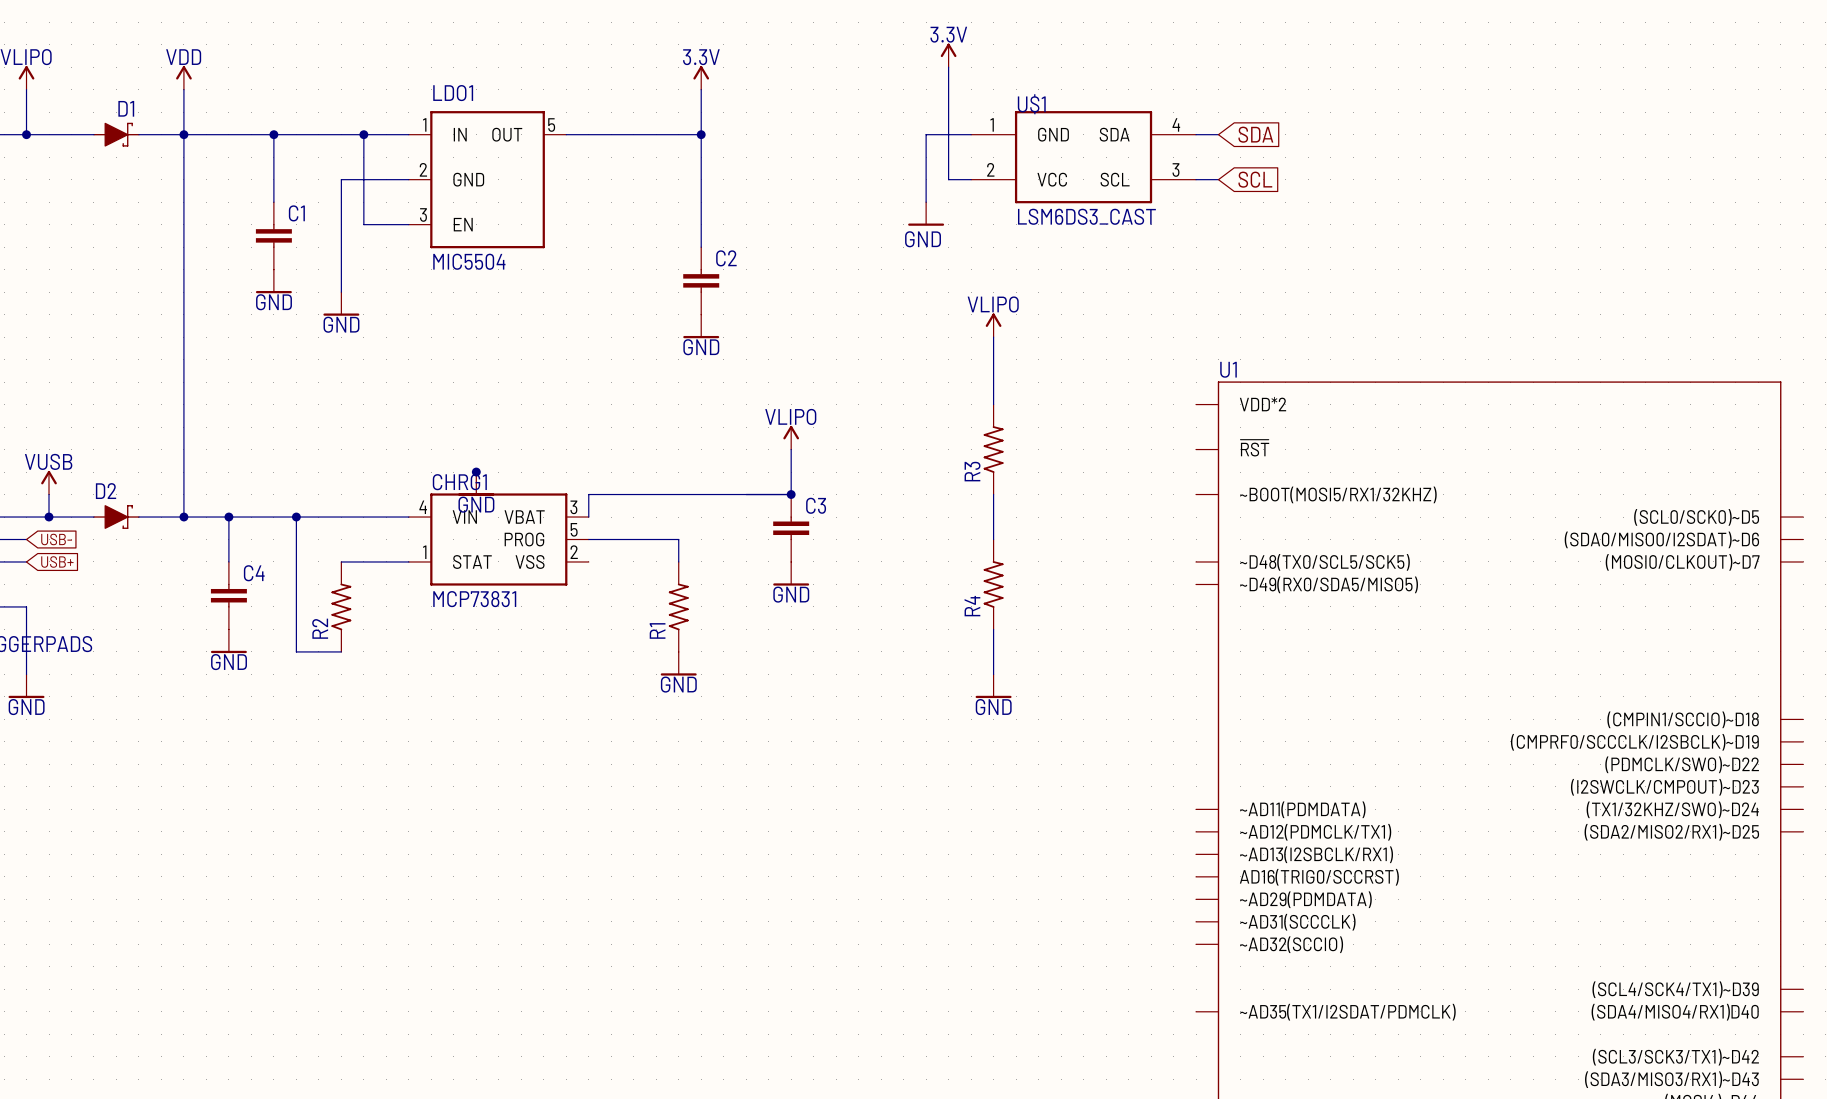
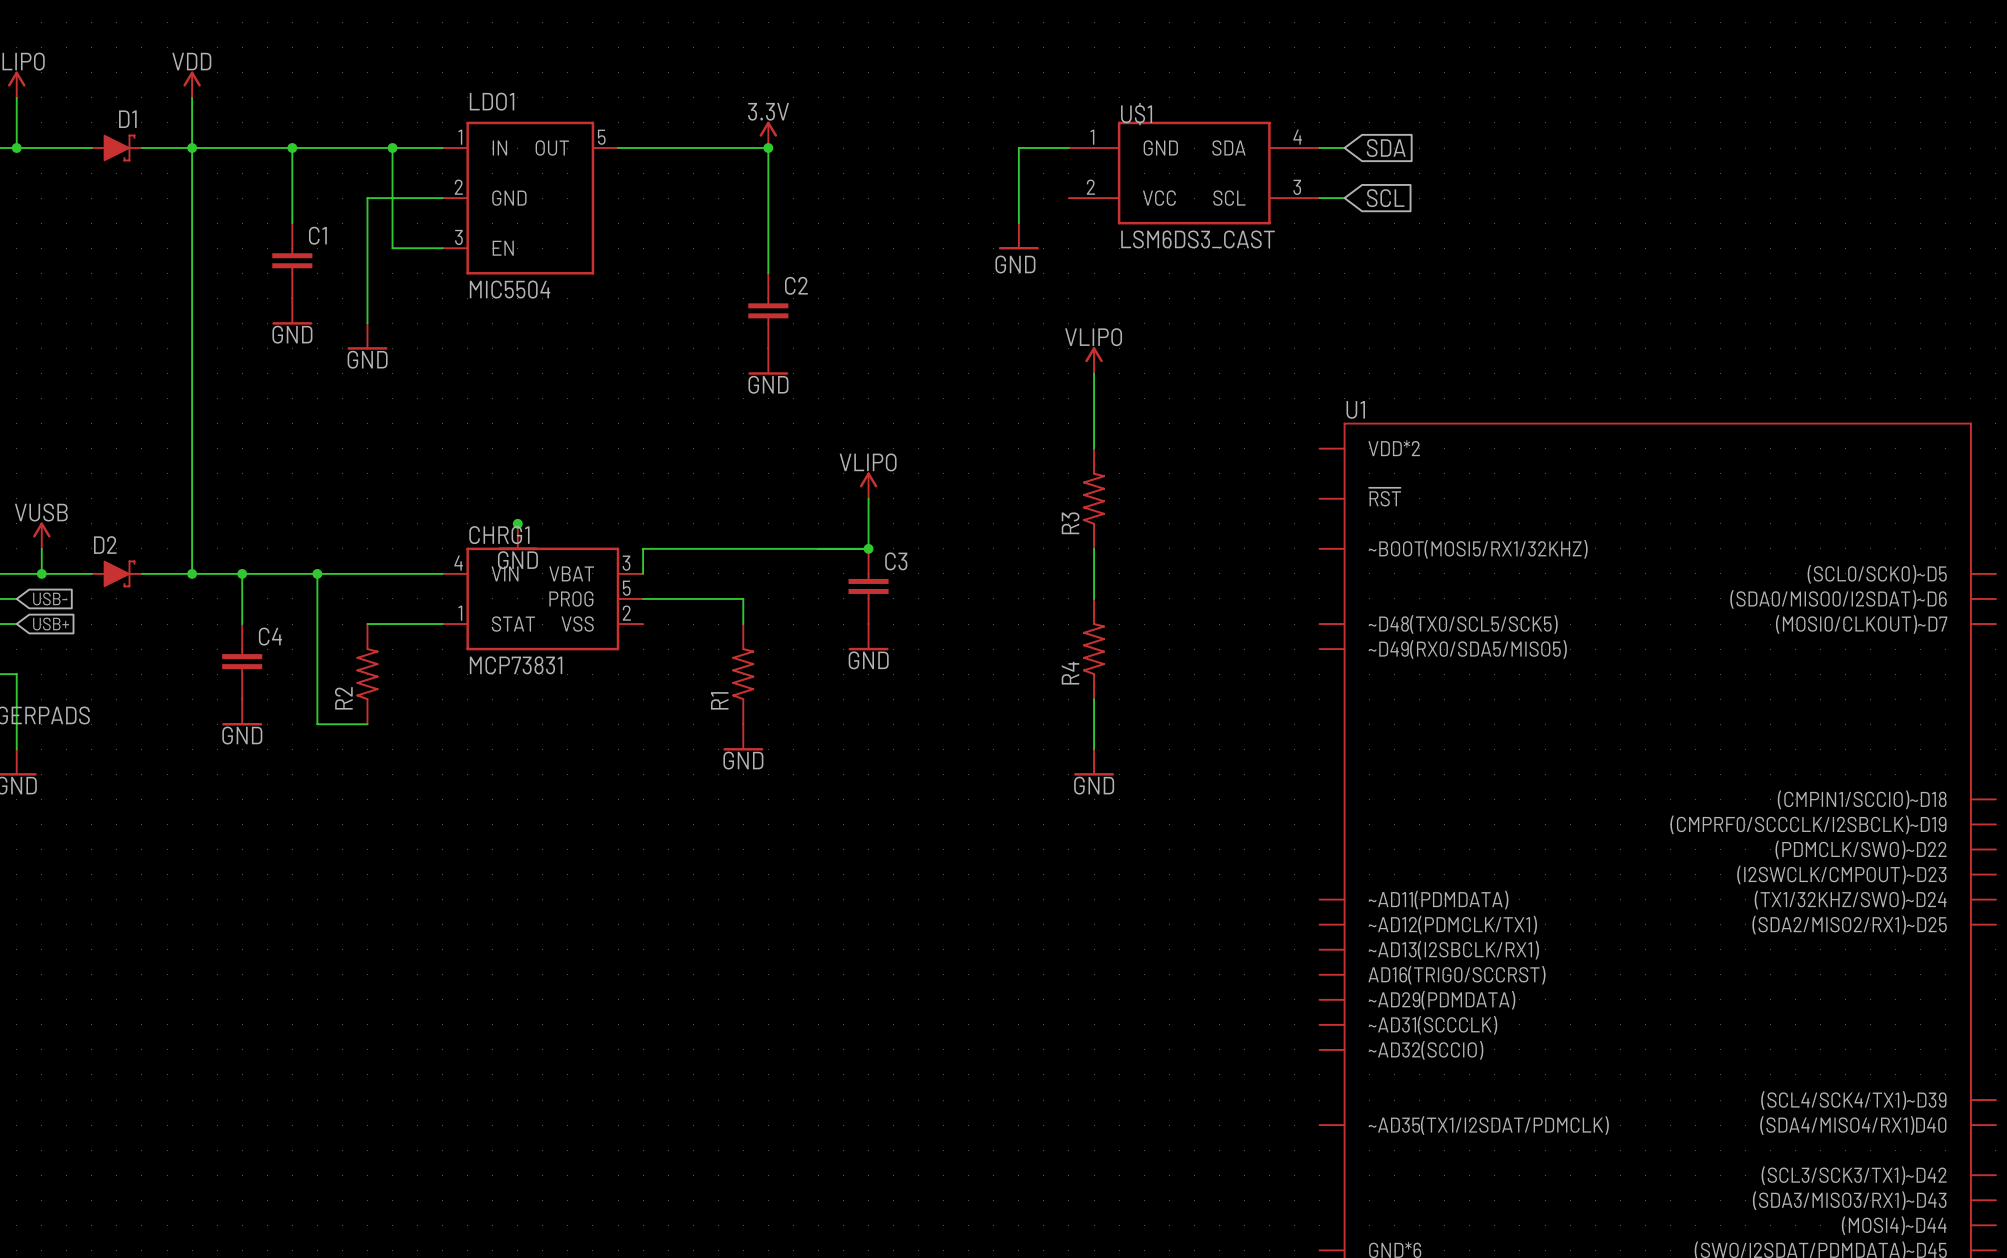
power symbol: 3.3V (948, 55) -> none
wire: (948, 67) (948, 179) (971, 179) -> none
power symbol position: 3.3V (701, 77) -> 3.3V (768, 134)

